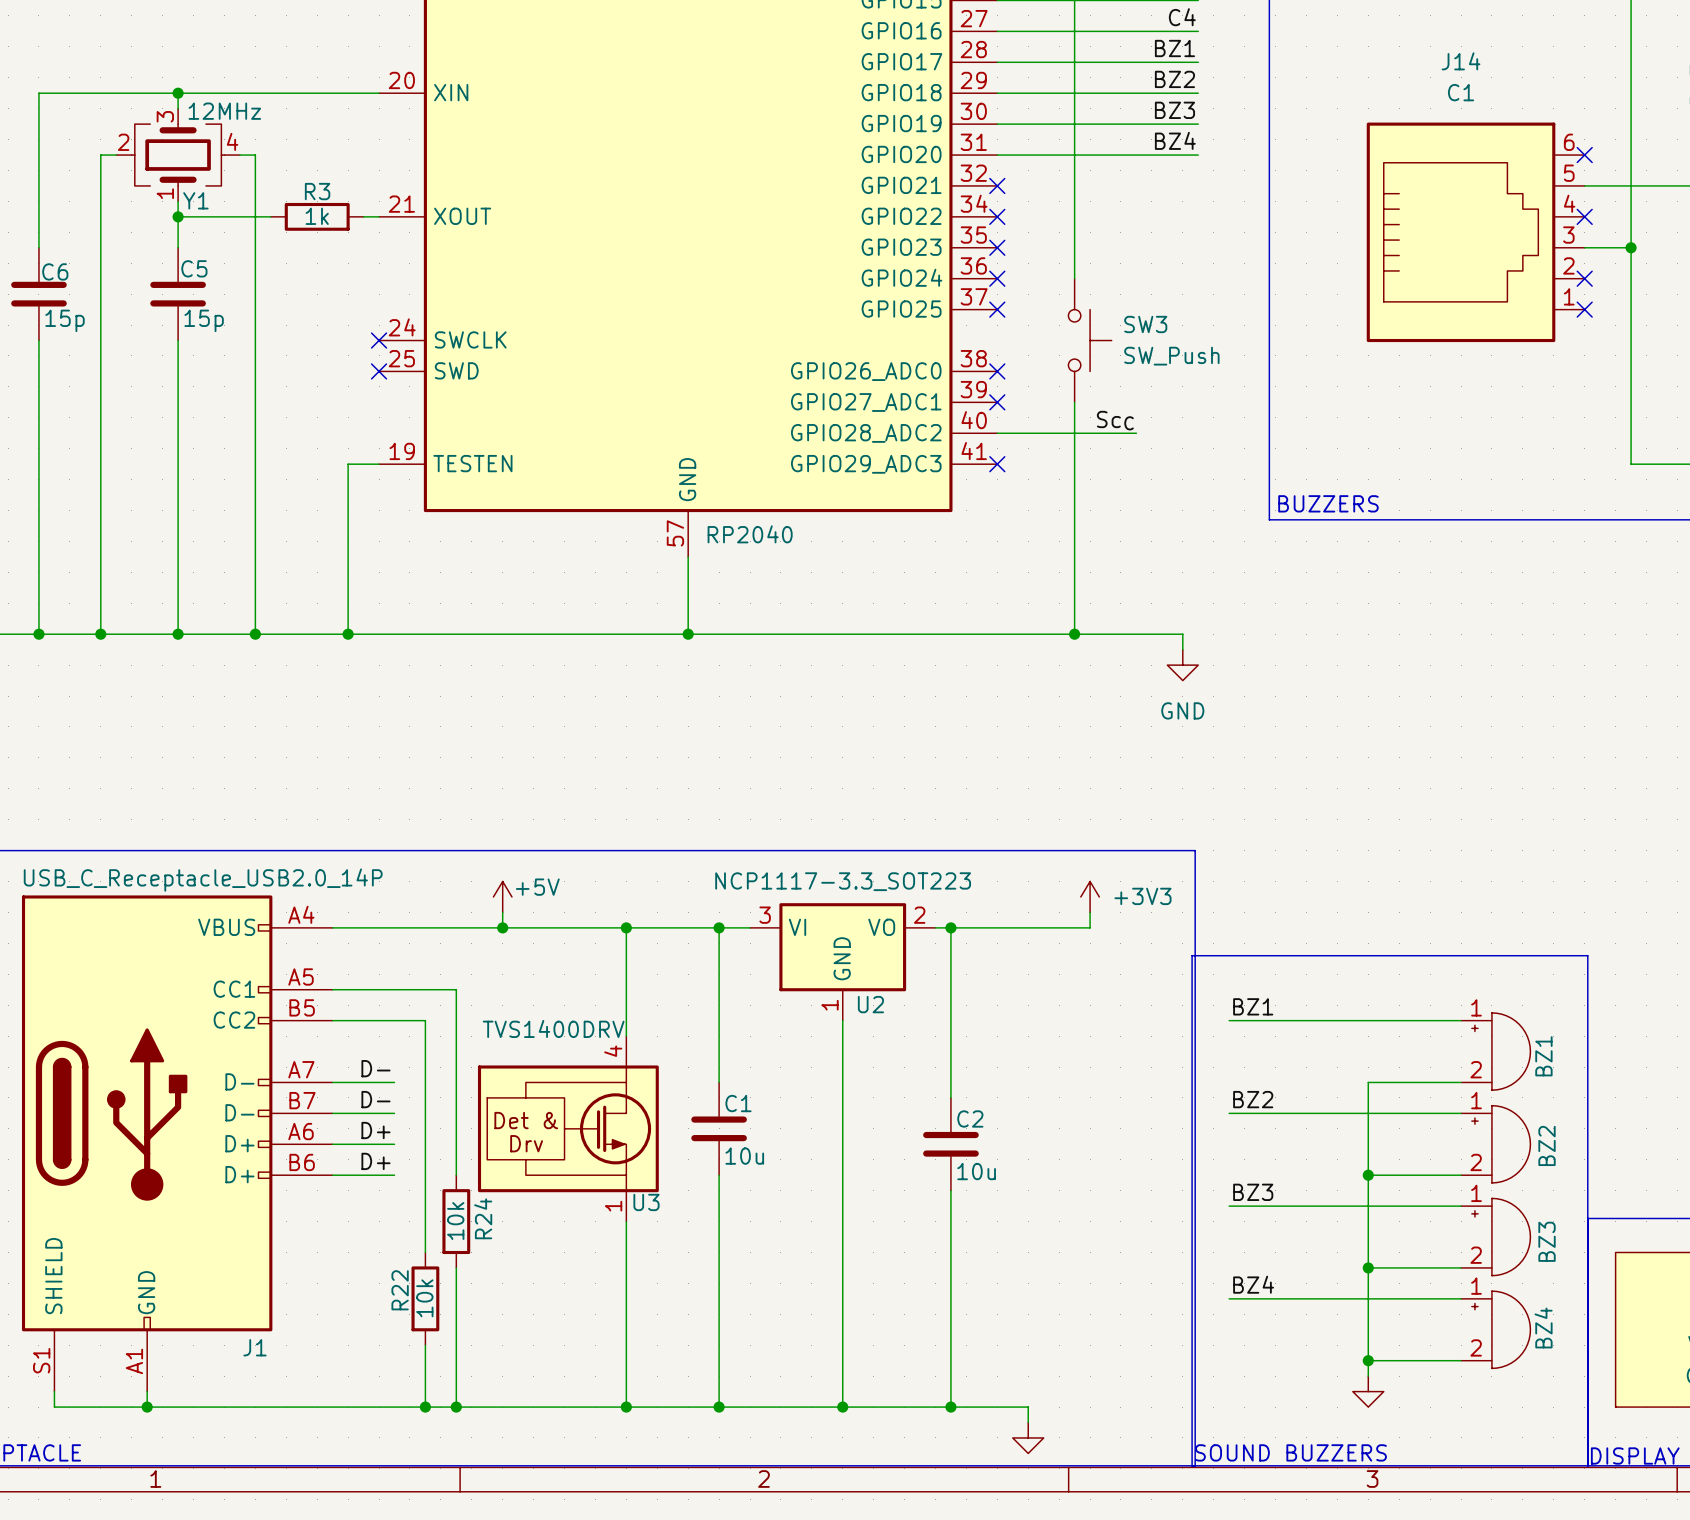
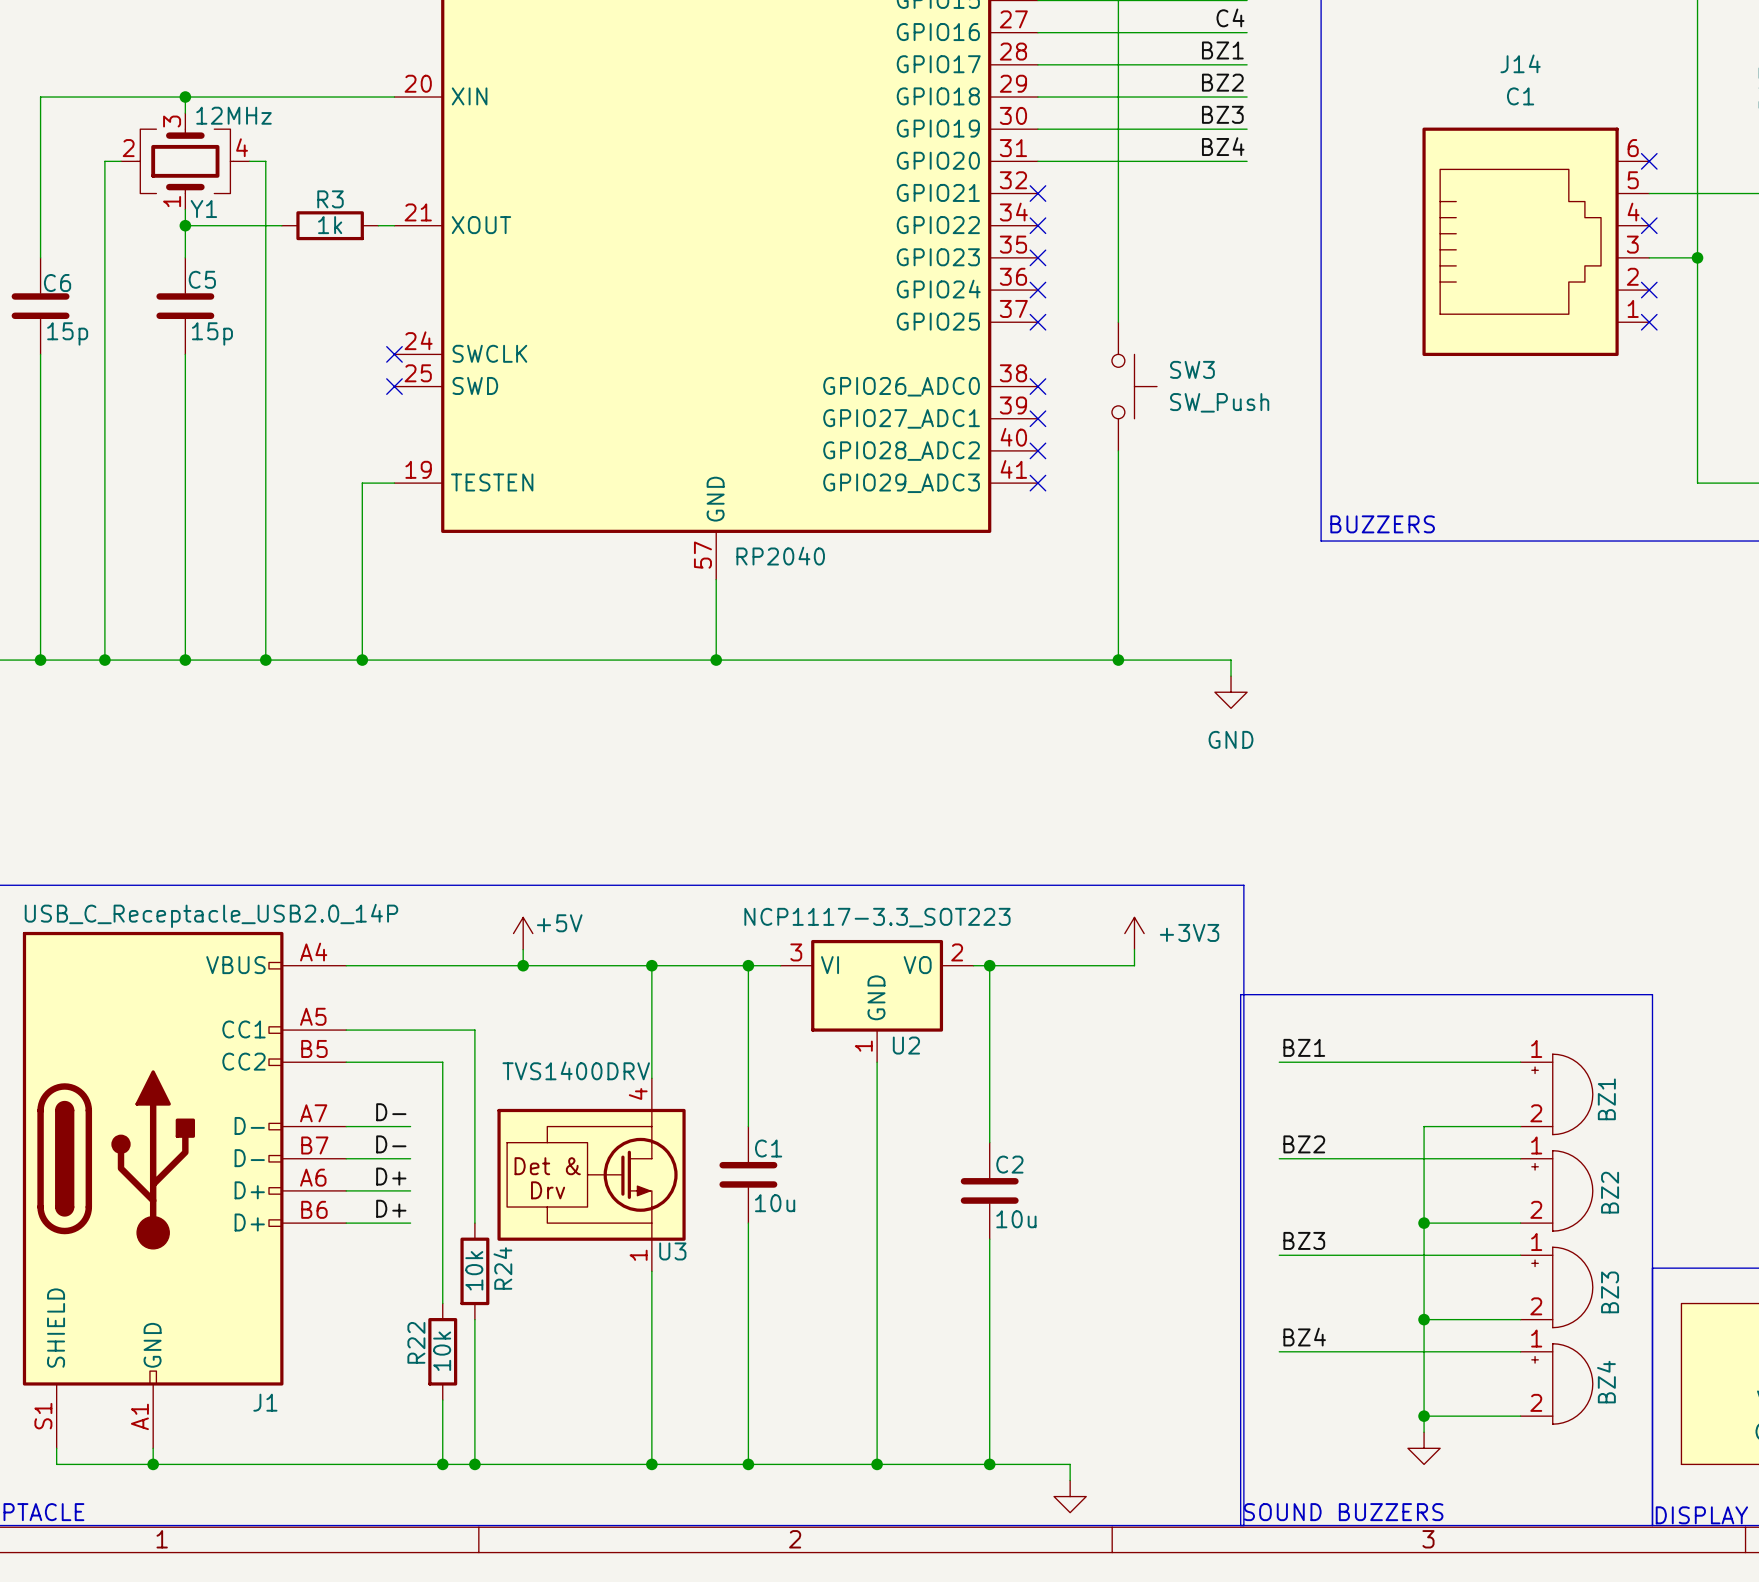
SW3 position: (1090, 340) -> (1134, 386)
label: ScC (1115, 420) -> none
wire: (997, 433) (1136, 433) -> none
no-connect mark: none -> (1037, 450)

